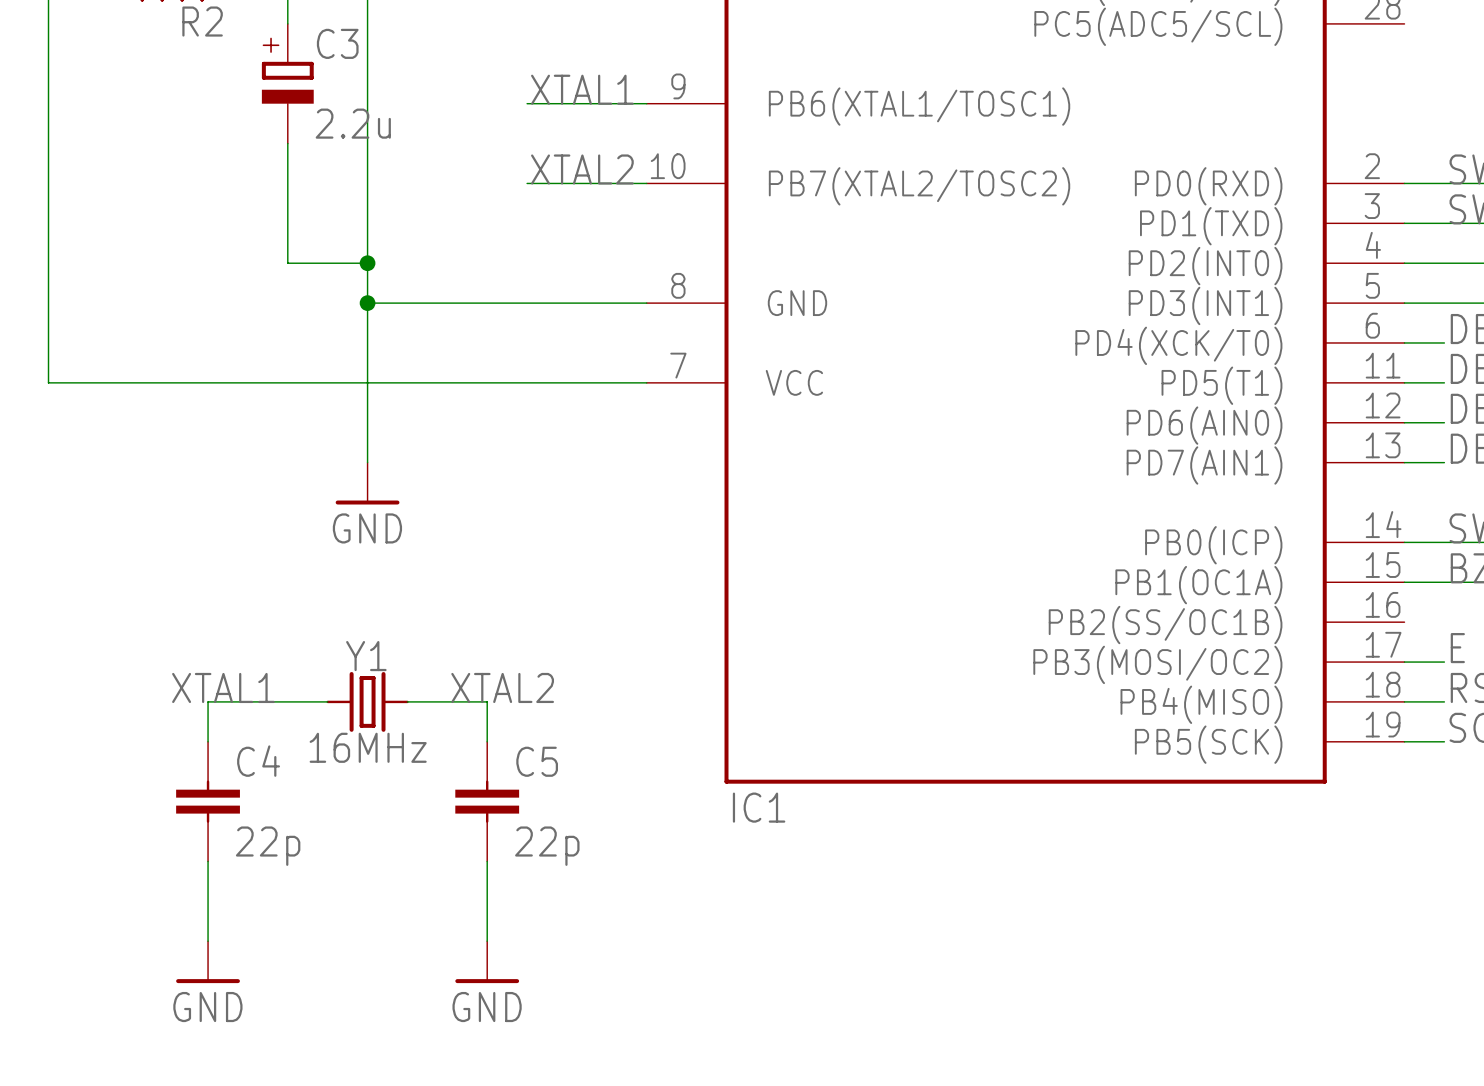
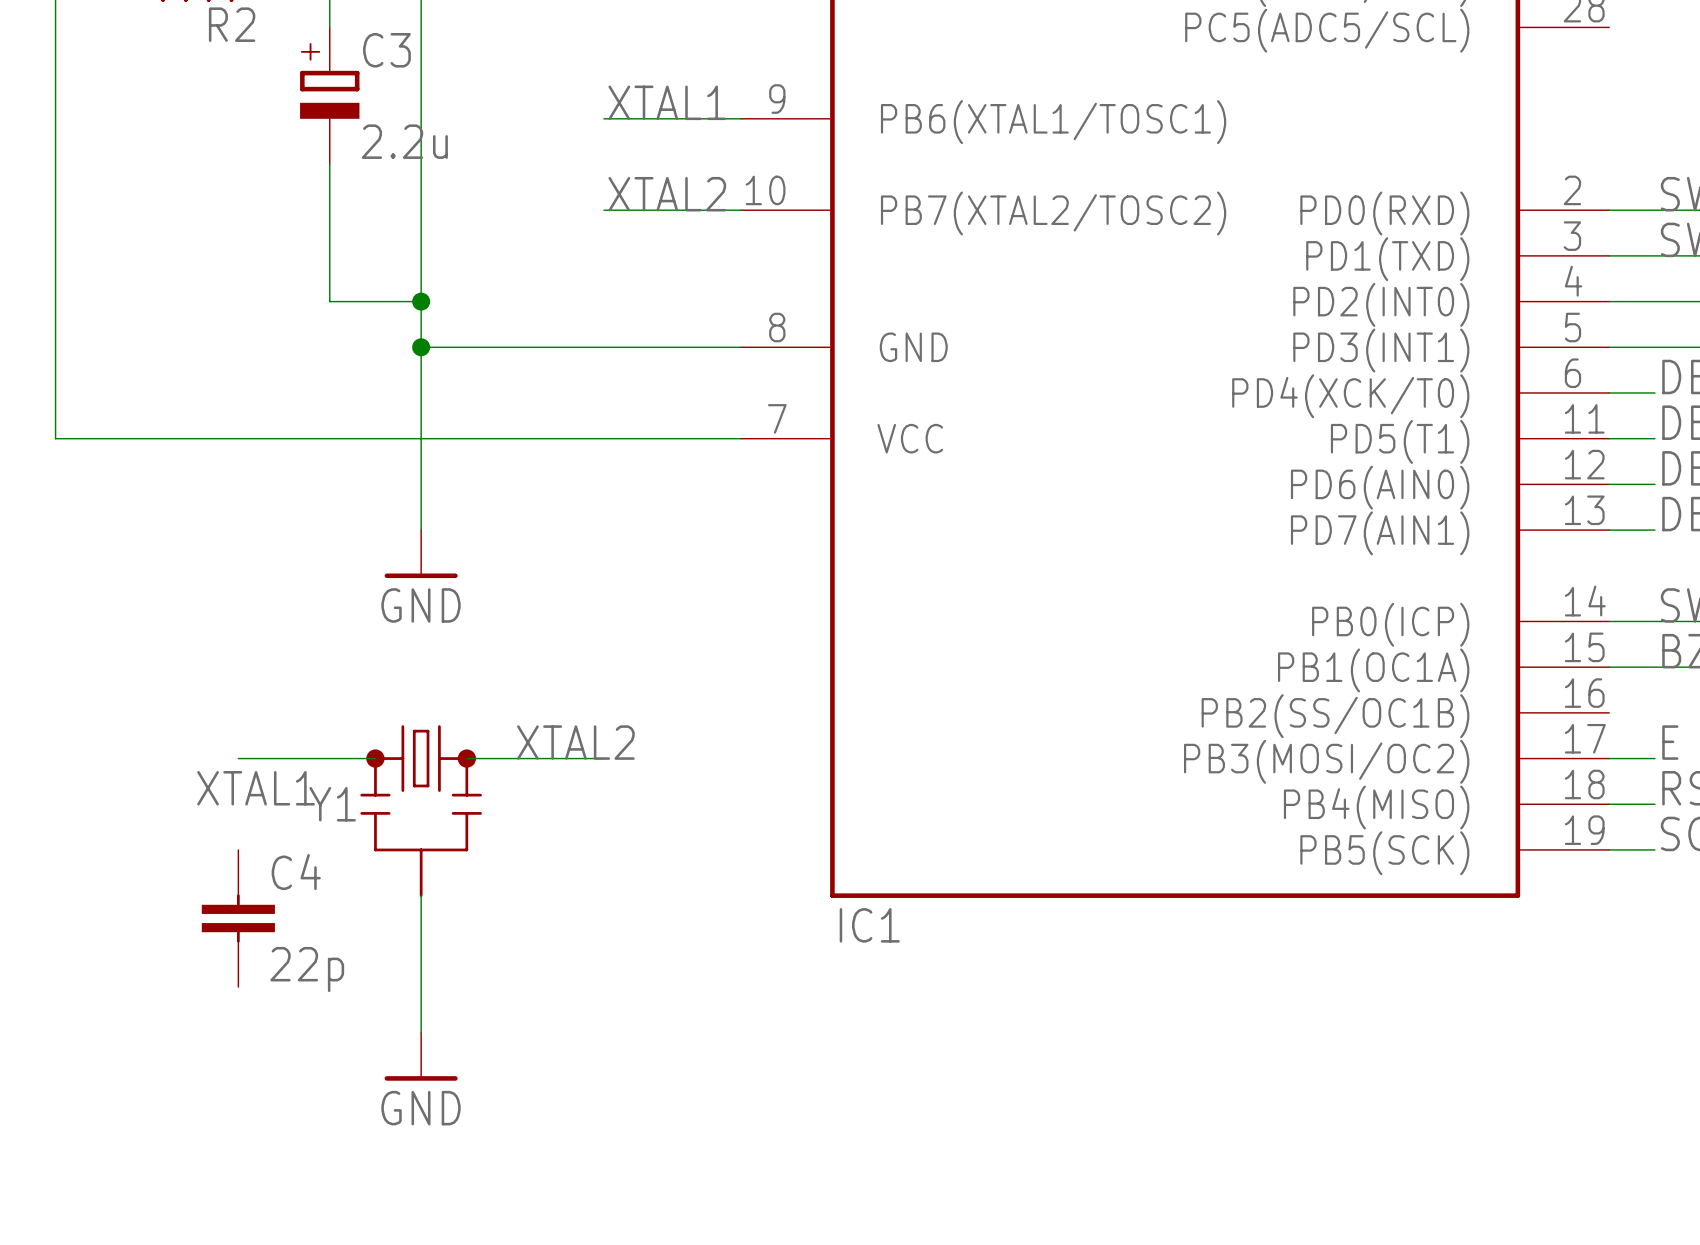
Y1 name position: Y1 (366, 656) -> Y1 (332, 804)
wire: none -> (238, 758) (375, 758)
wire: none -> (466, 758) (603, 758)
Y1 symbol: [326, 672, 409, 732] -> [360, 725, 482, 898]
label position: XTAL2 (502, 687) -> XTAL2 (575, 742)
wire: (327, 701) (208, 701) (208, 741) -> none
wire: (407, 701) (487, 701) (487, 741) -> none
Y1 value: 16MHz (368, 747) -> none
wire: none -> (421, 895) (421, 1032)
C5: 22p (487, 801) -> none
wire: (208, 861) (208, 941) -> none
wire: (487, 861) (487, 941) -> none
power symbol: none -> GND (421, 1056)
power symbol: GND (208, 962) -> none
power symbol: GND (487, 962) -> none

